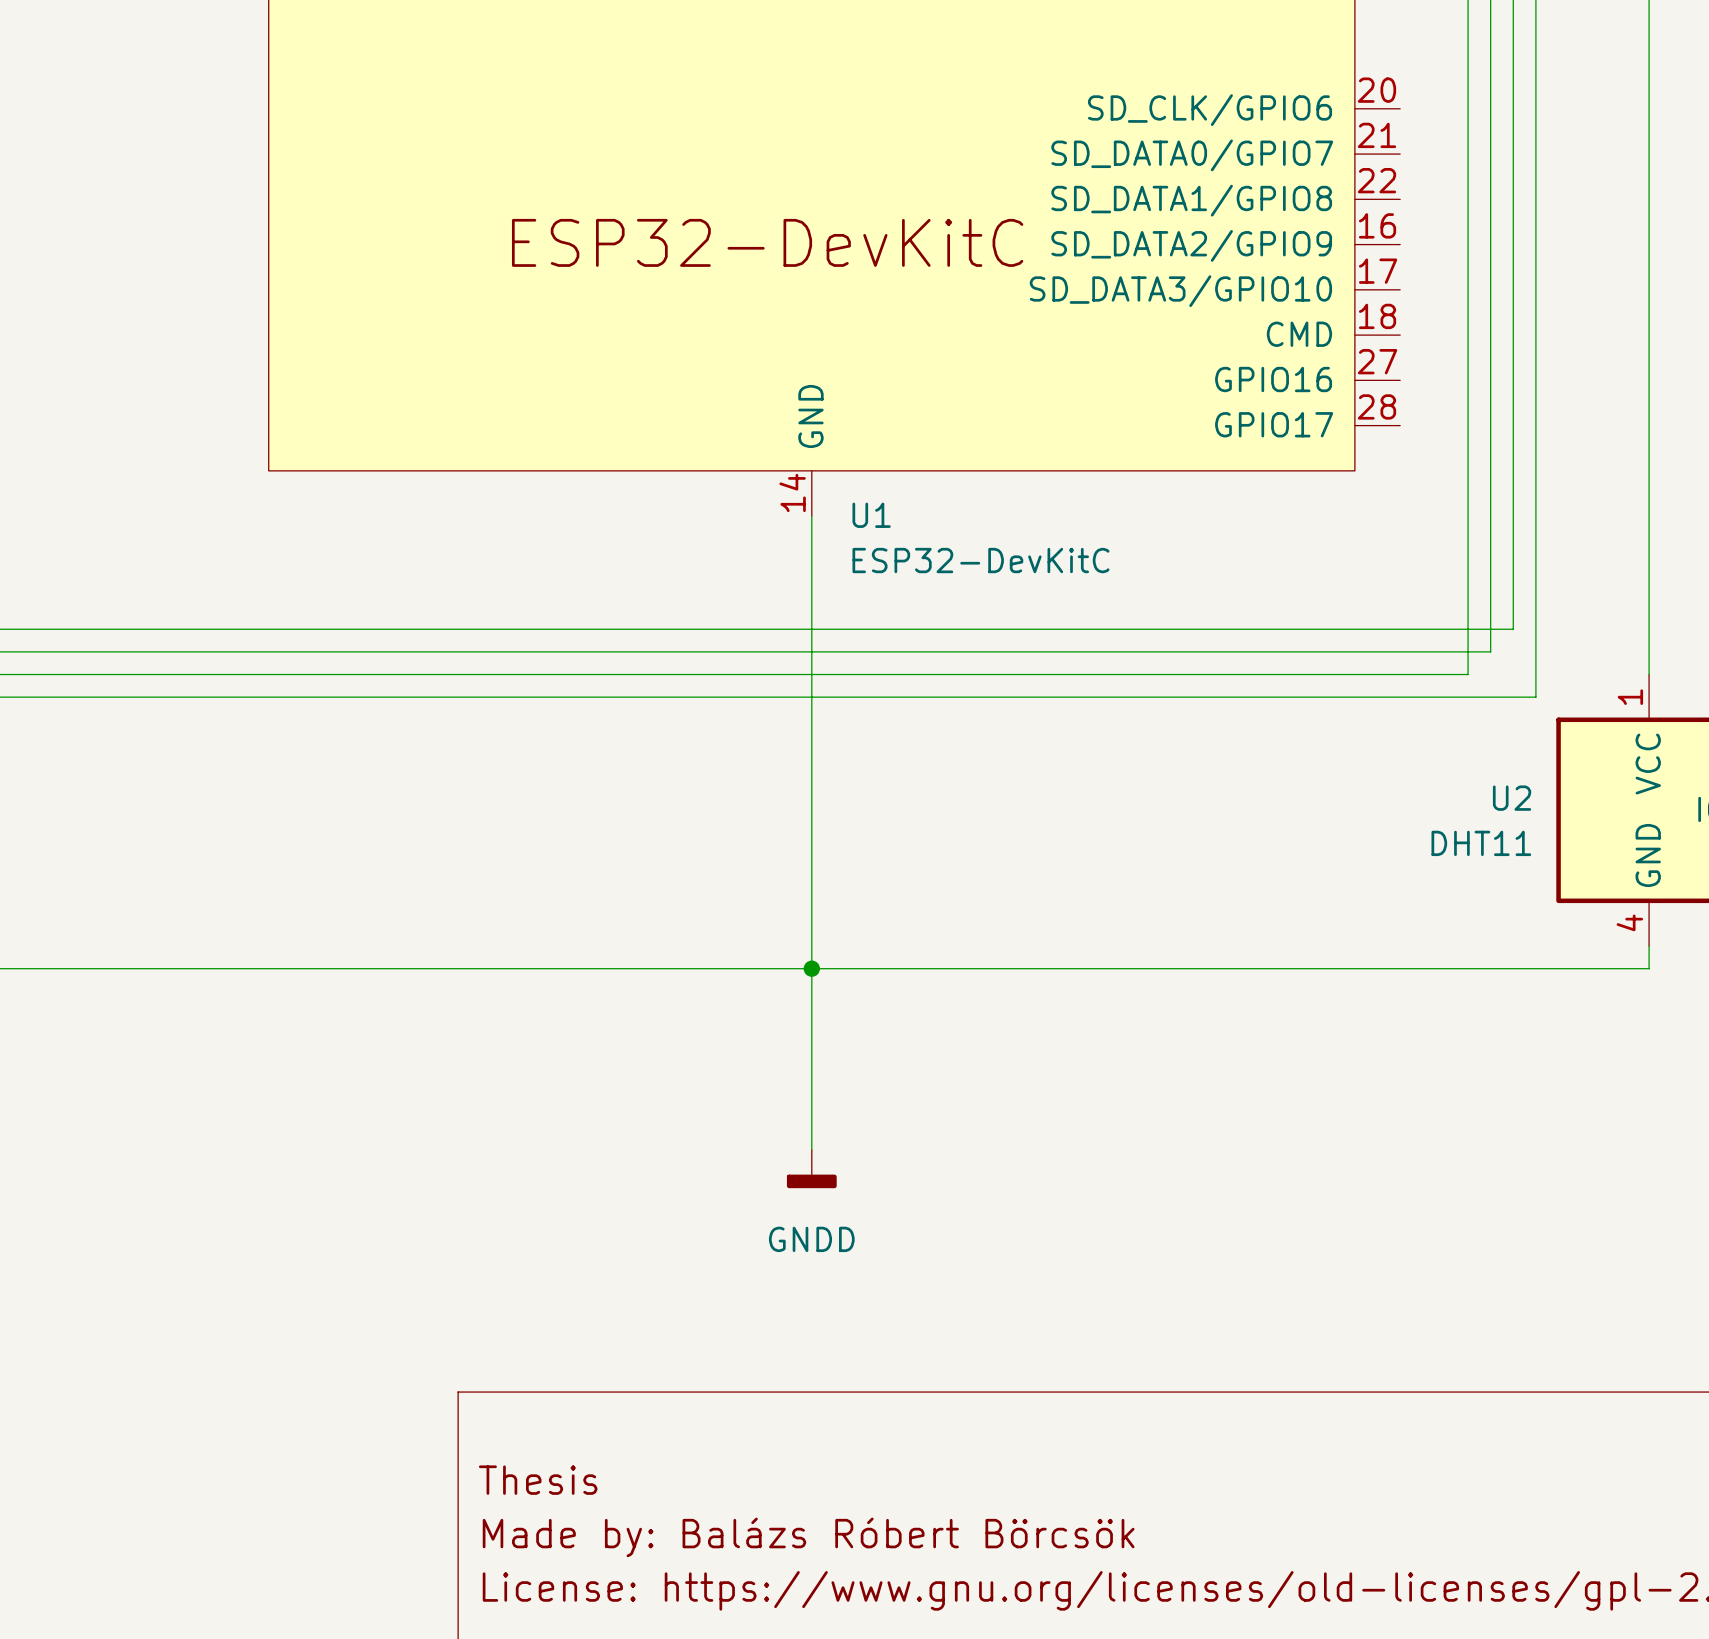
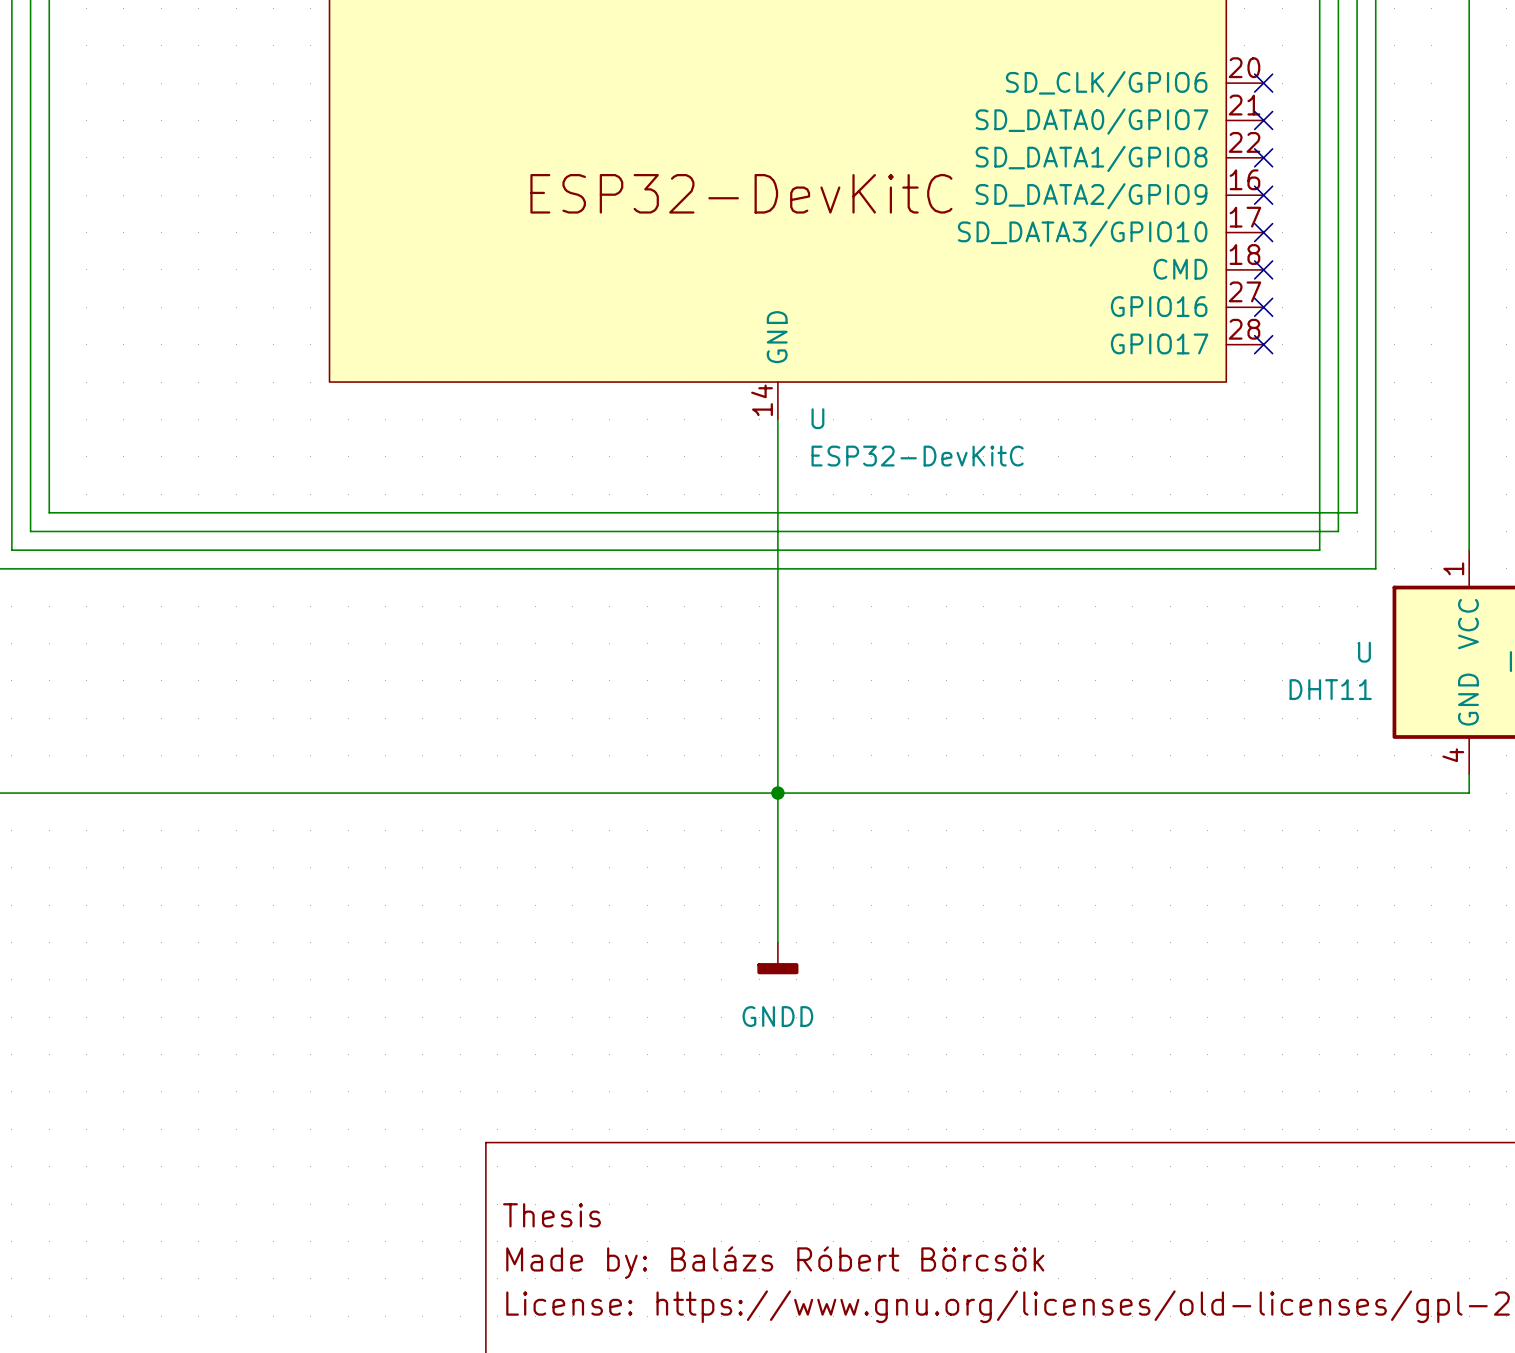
no-connect mark: none -> (1263, 83)
no-connect mark: none -> (1263, 120)
no-connect mark: none -> (1263, 157)
no-connect mark: none -> (1263, 195)
no-connect mark: none -> (1263, 232)
no-connect mark: none -> (1263, 269)
no-connect mark: none -> (1263, 307)
no-connect mark: none -> (1263, 344)
U1 name: U1 (871, 515) -> U (817, 418)
U2 name: U2 (1512, 798) -> U (1364, 652)

